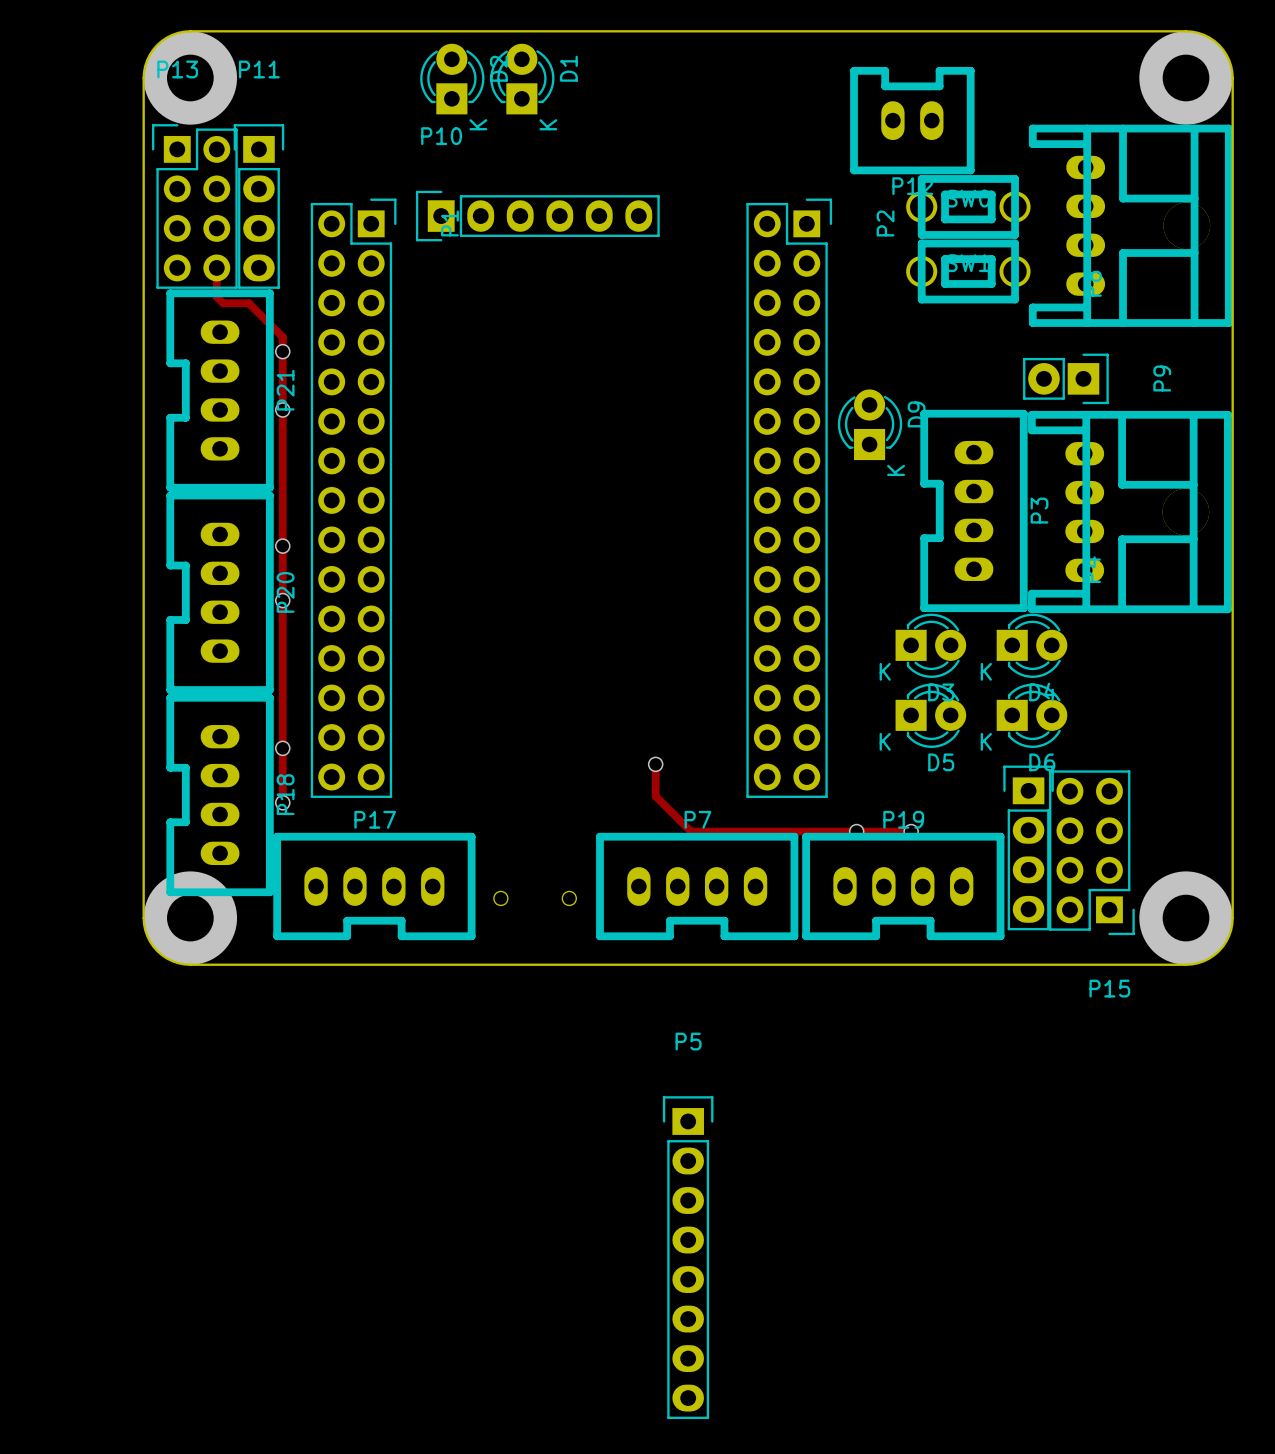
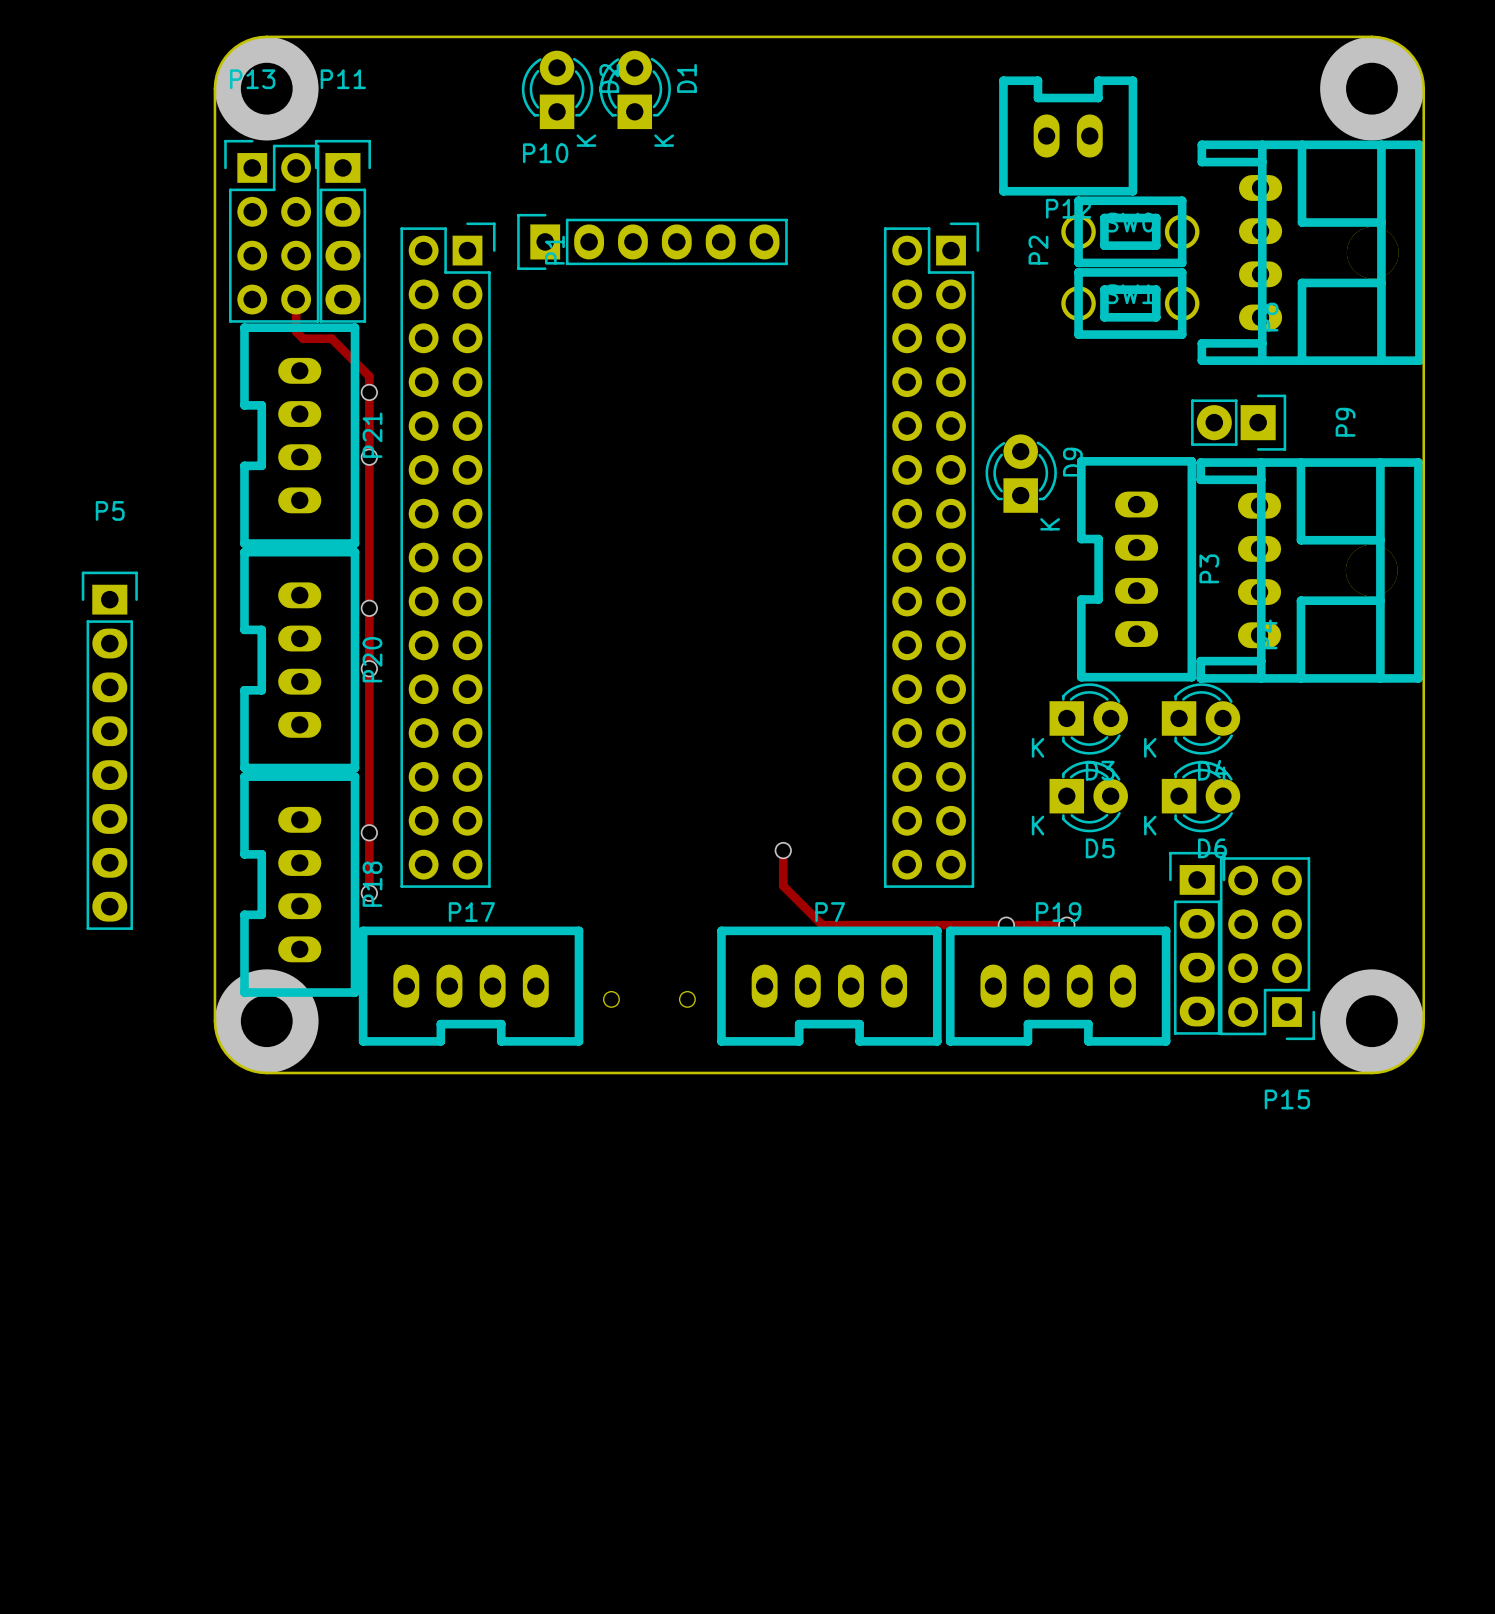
P5 position: (688, 1257) -> (109, 750)

